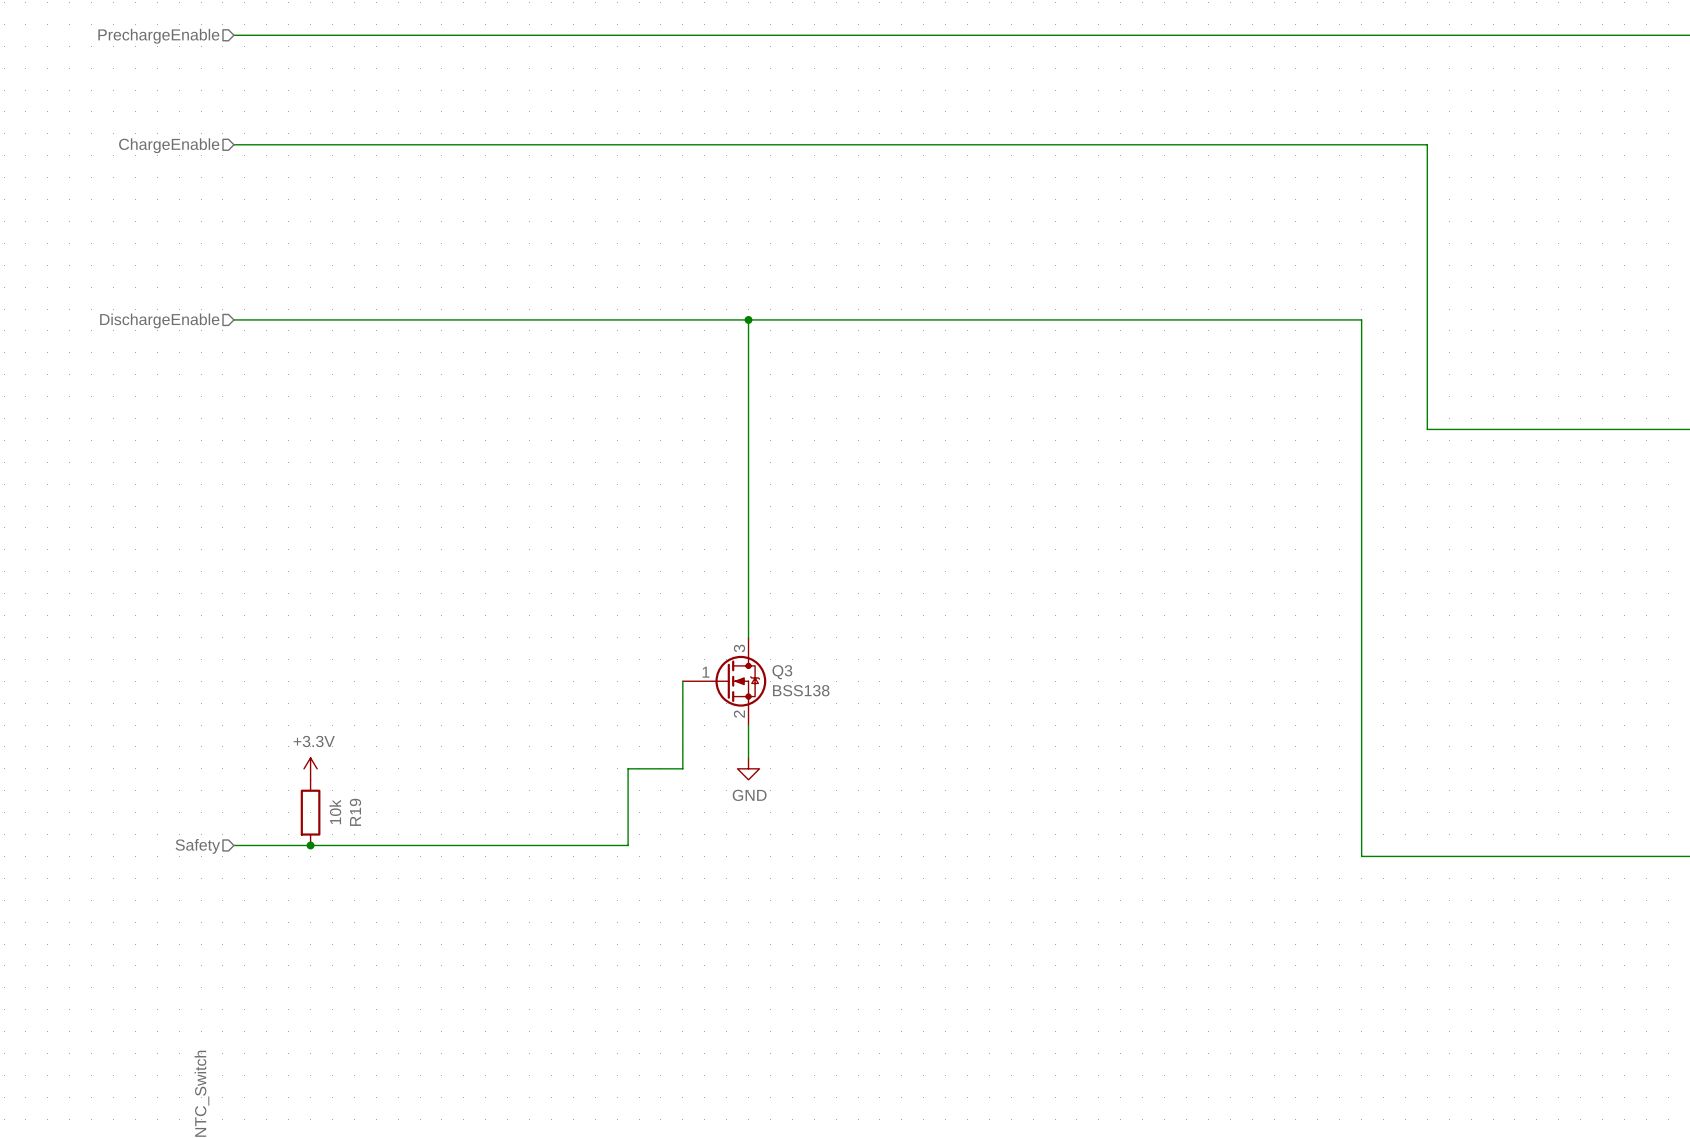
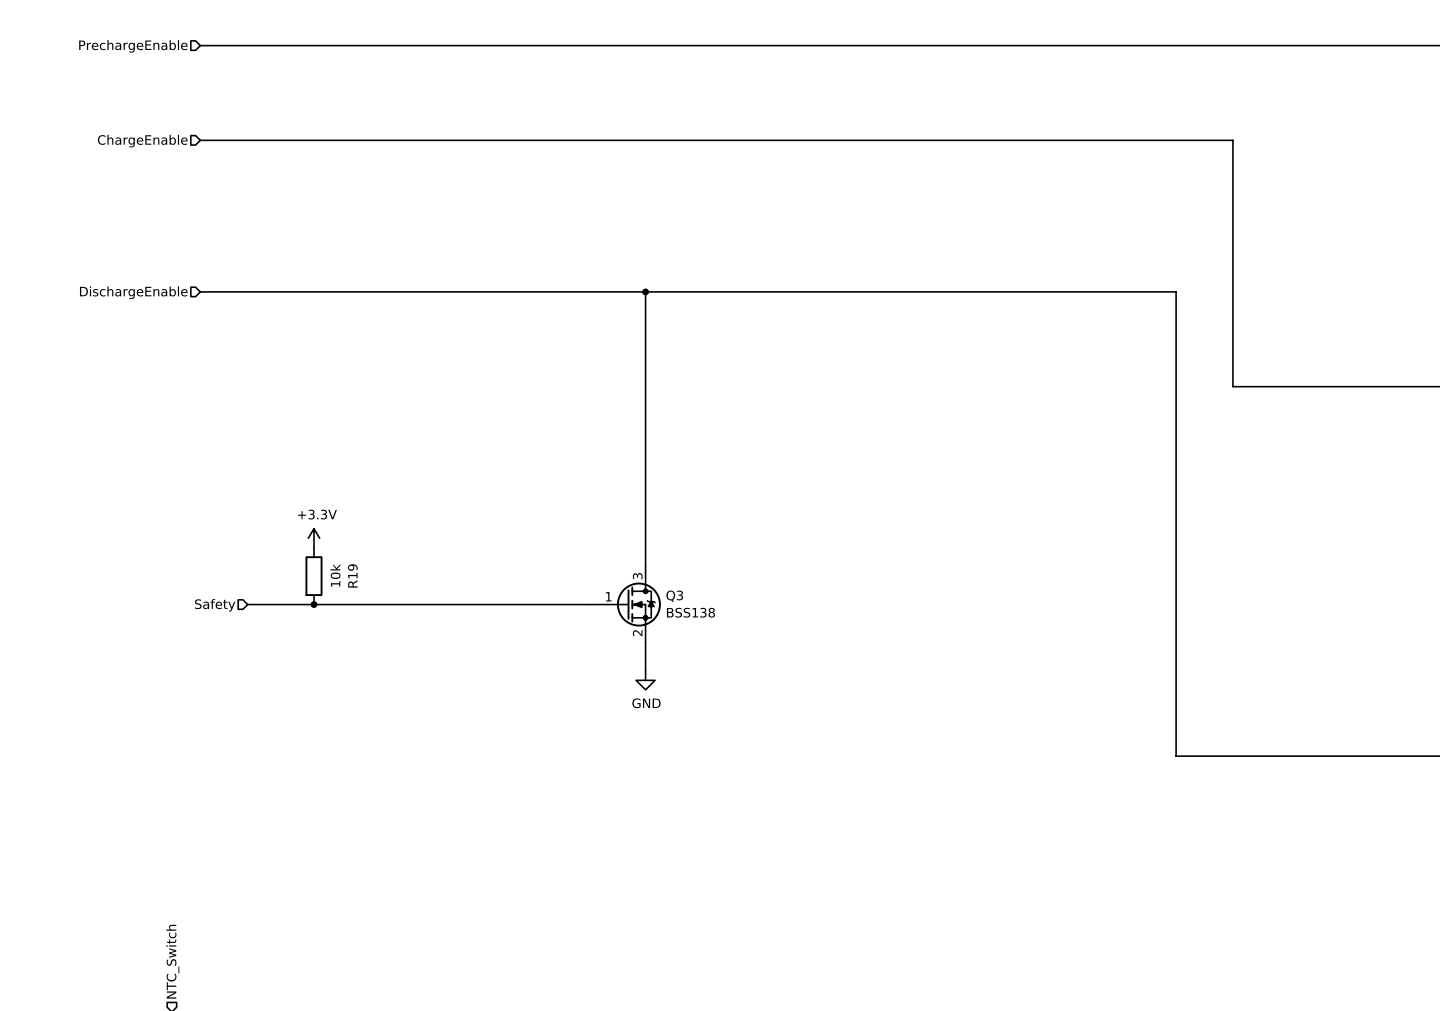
junction: none -> (313, 604)
wire: (682, 681) (682, 768) (628, 768) (628, 845) (233, 845) -> (588, 604) (247, 604)
power symbol position: +3.3V (310, 768) -> +3.3V (313, 538)
R19 position: (310, 812) -> (313, 576)
junction: (310, 845) -> none
hierarchical label position: Safety (197, 846) -> Safety (215, 605)

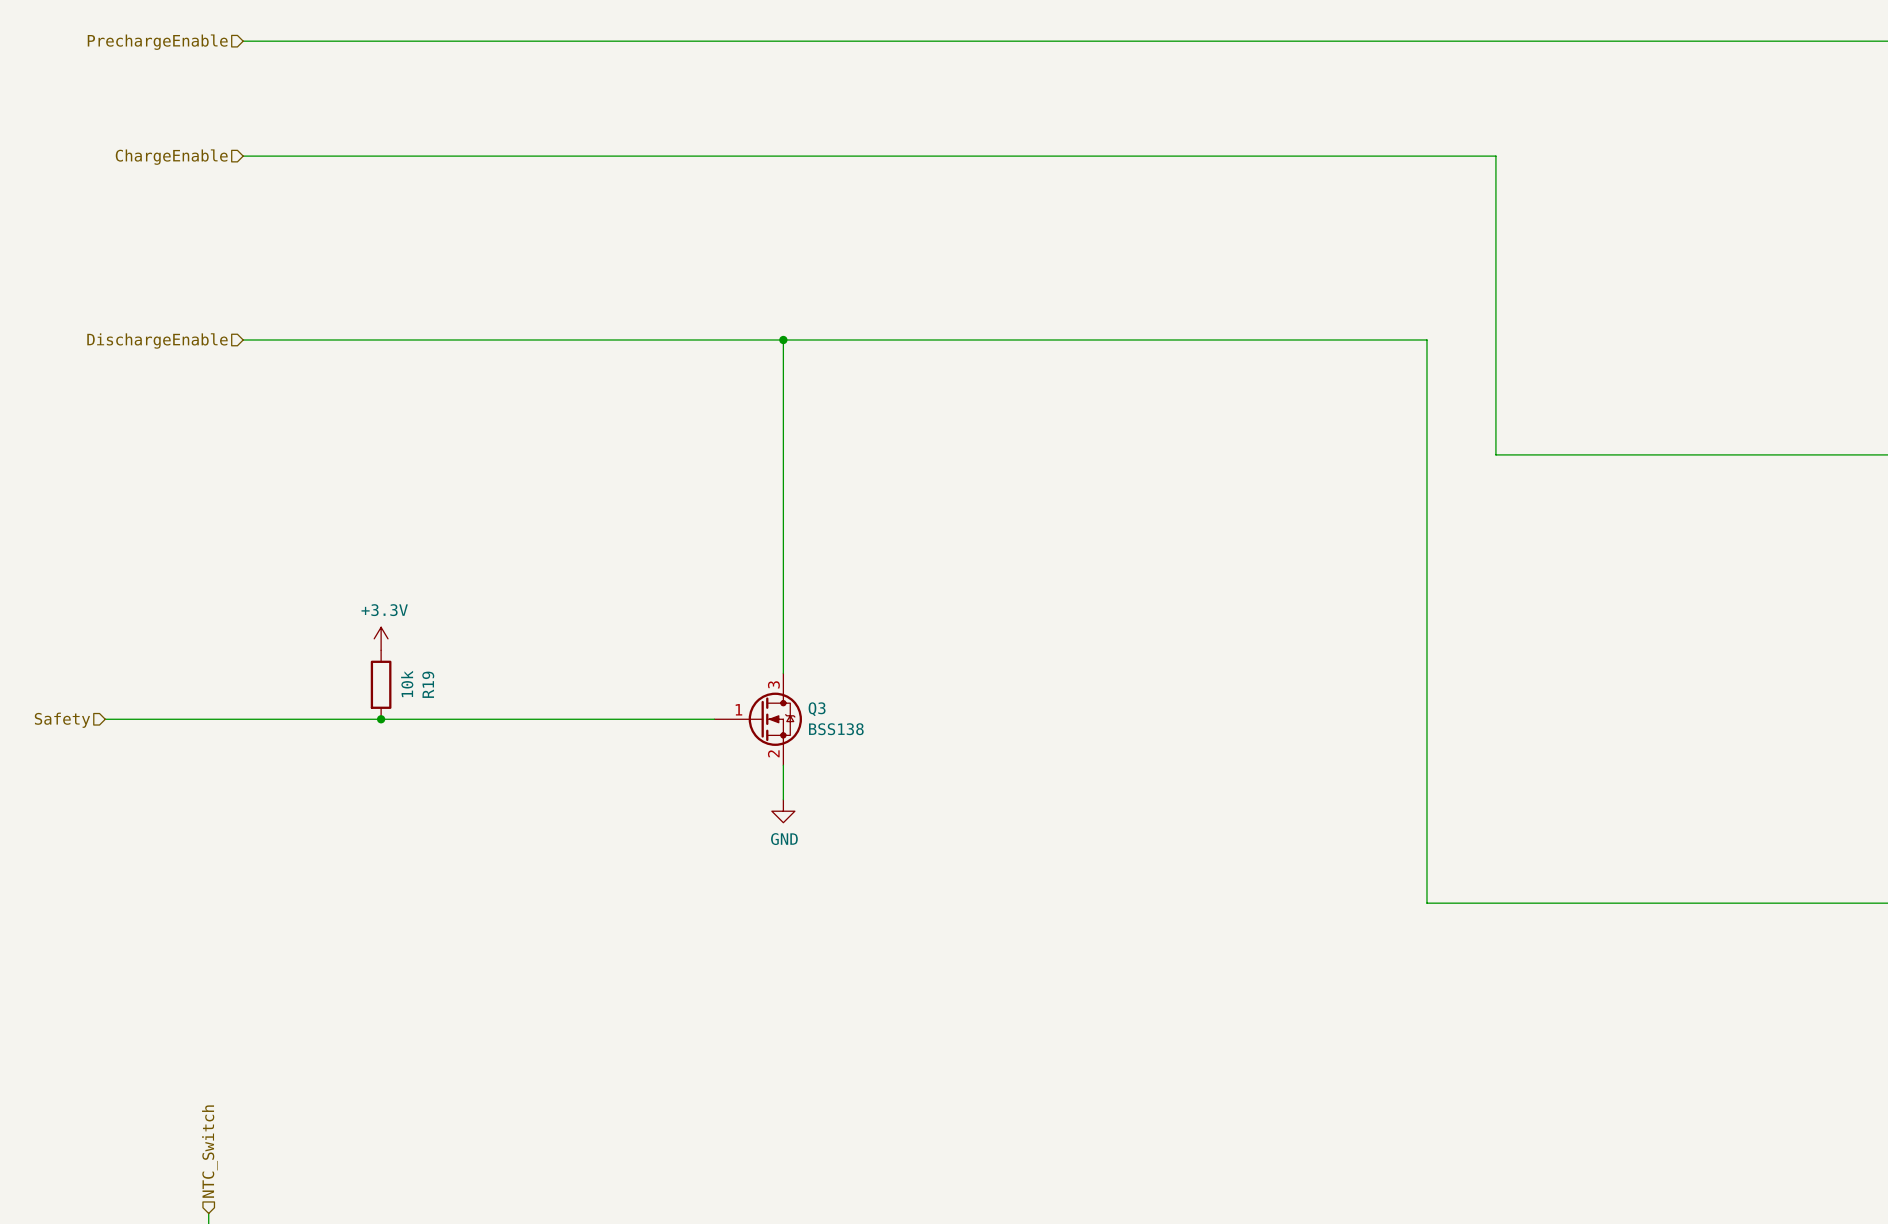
wire: none -> (105, 719) (300, 719)
hierarchical label position: Safety (215, 605) -> Safety (62, 720)

